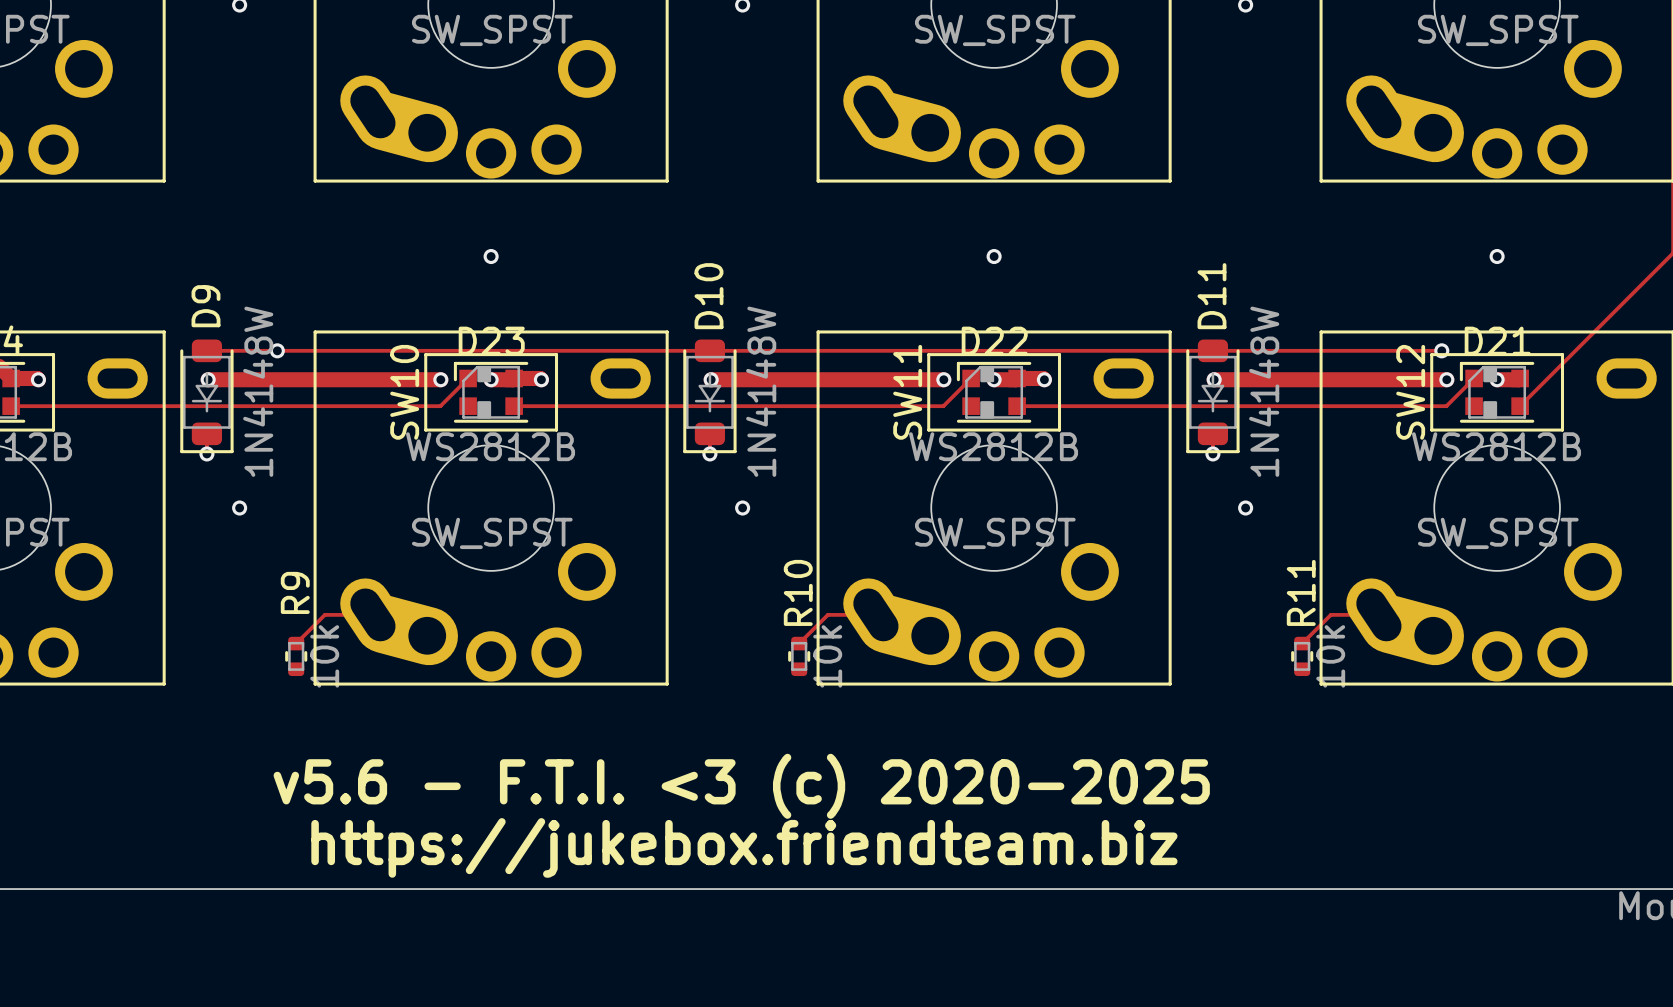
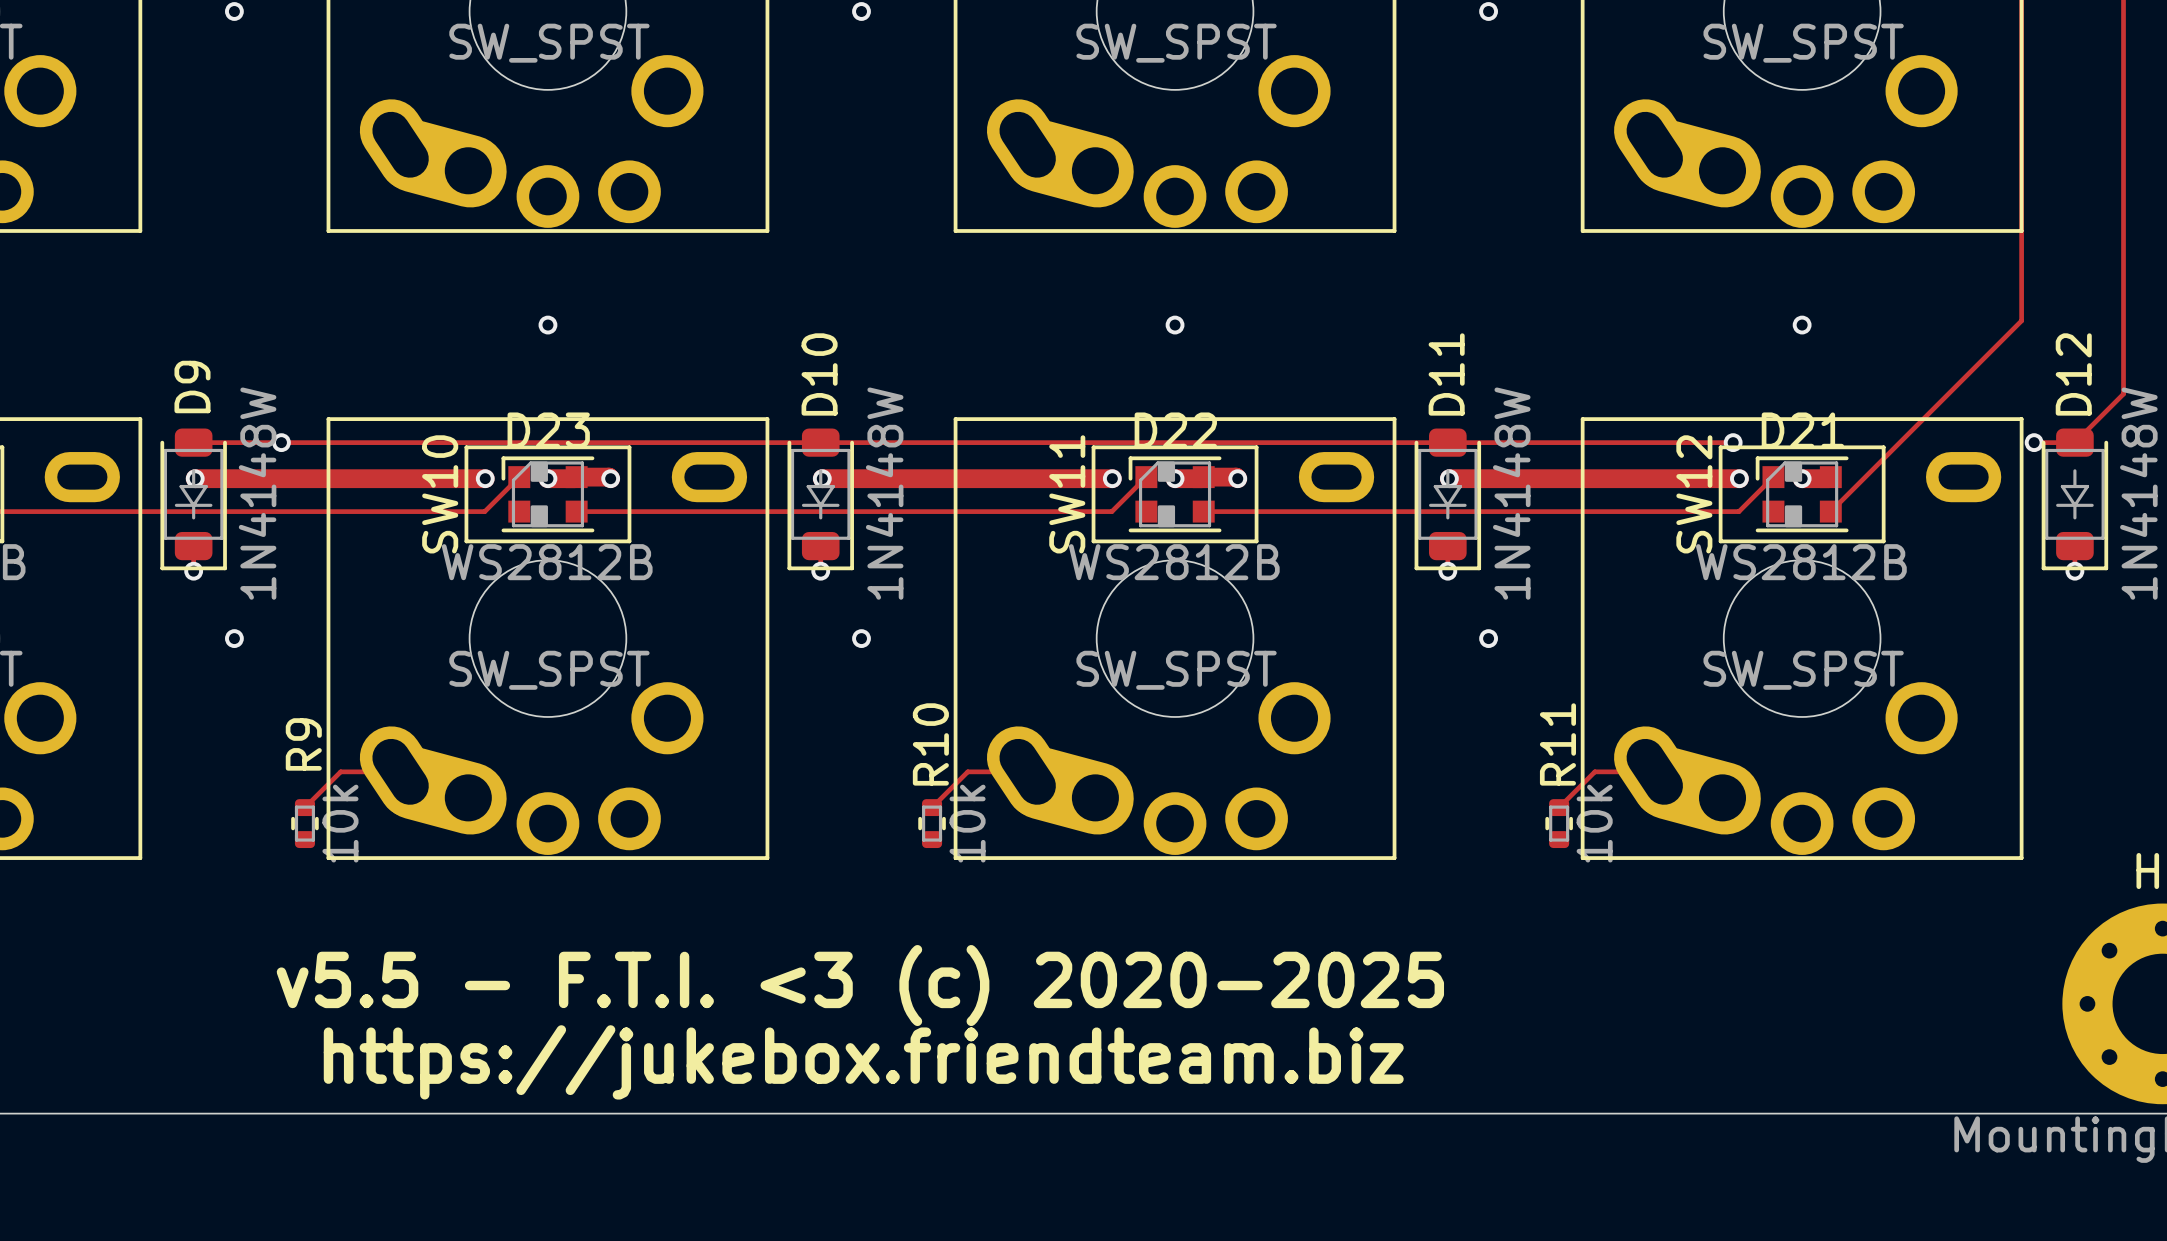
text: v5.6 - F.T.I. <3 (c) 2020-2025 (741, 786) -> v5.5 - F.T.I. <3 (c) 2020-2025 (860, 985)

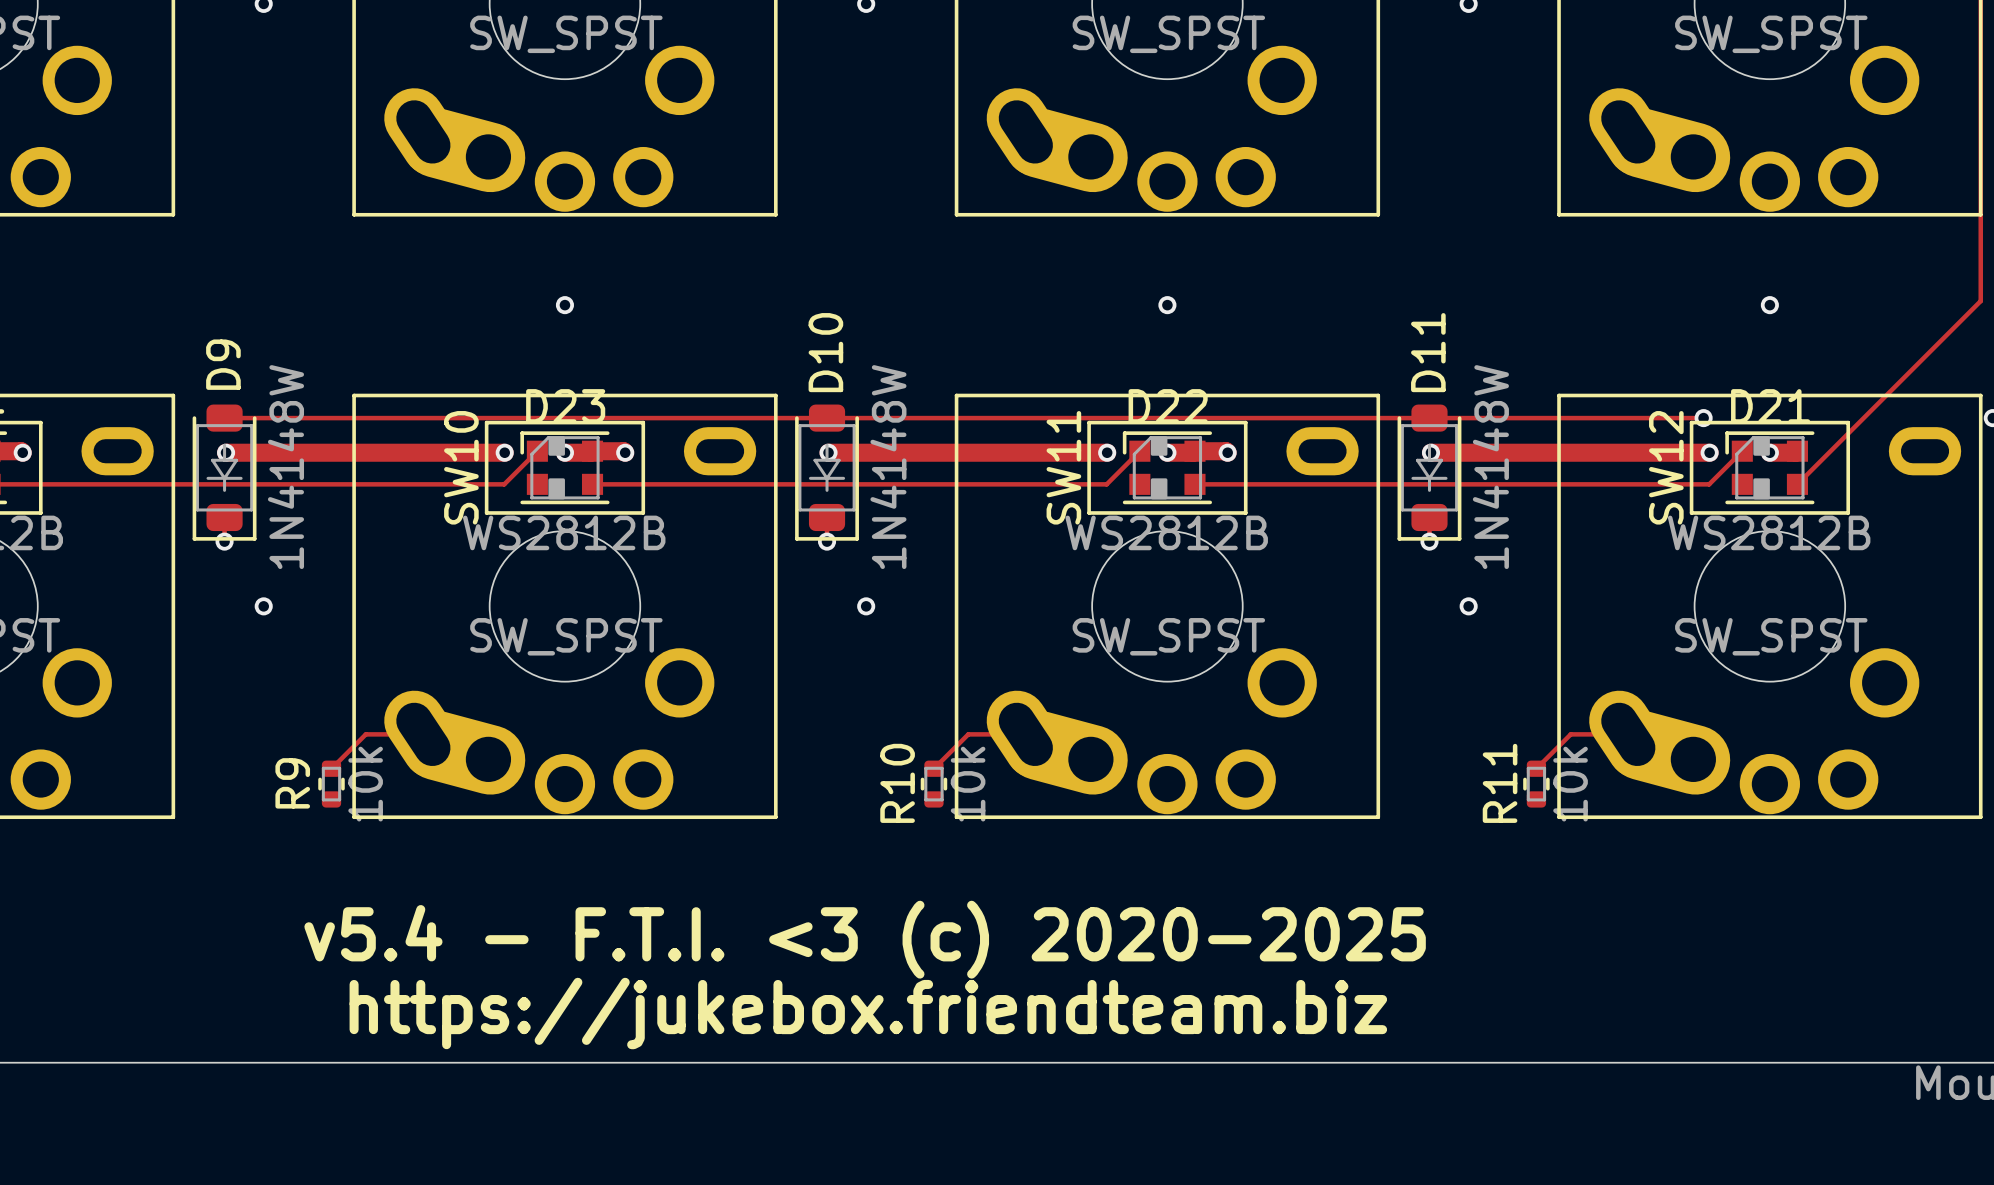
via: (281, 442) -> none
R9 name position: R9 (303, 744) -> R9 (292, 783)
R10 name position: R10 (930, 744) -> R10 (897, 783)
R11 name position: R11 (1557, 744) -> R11 (1500, 783)
text: v5.5 - F.T.I. <3 (c) 2020-2025 (860, 985) -> v5.4 - F.T.I. <3 (c) 2020-2025 (865, 939)

